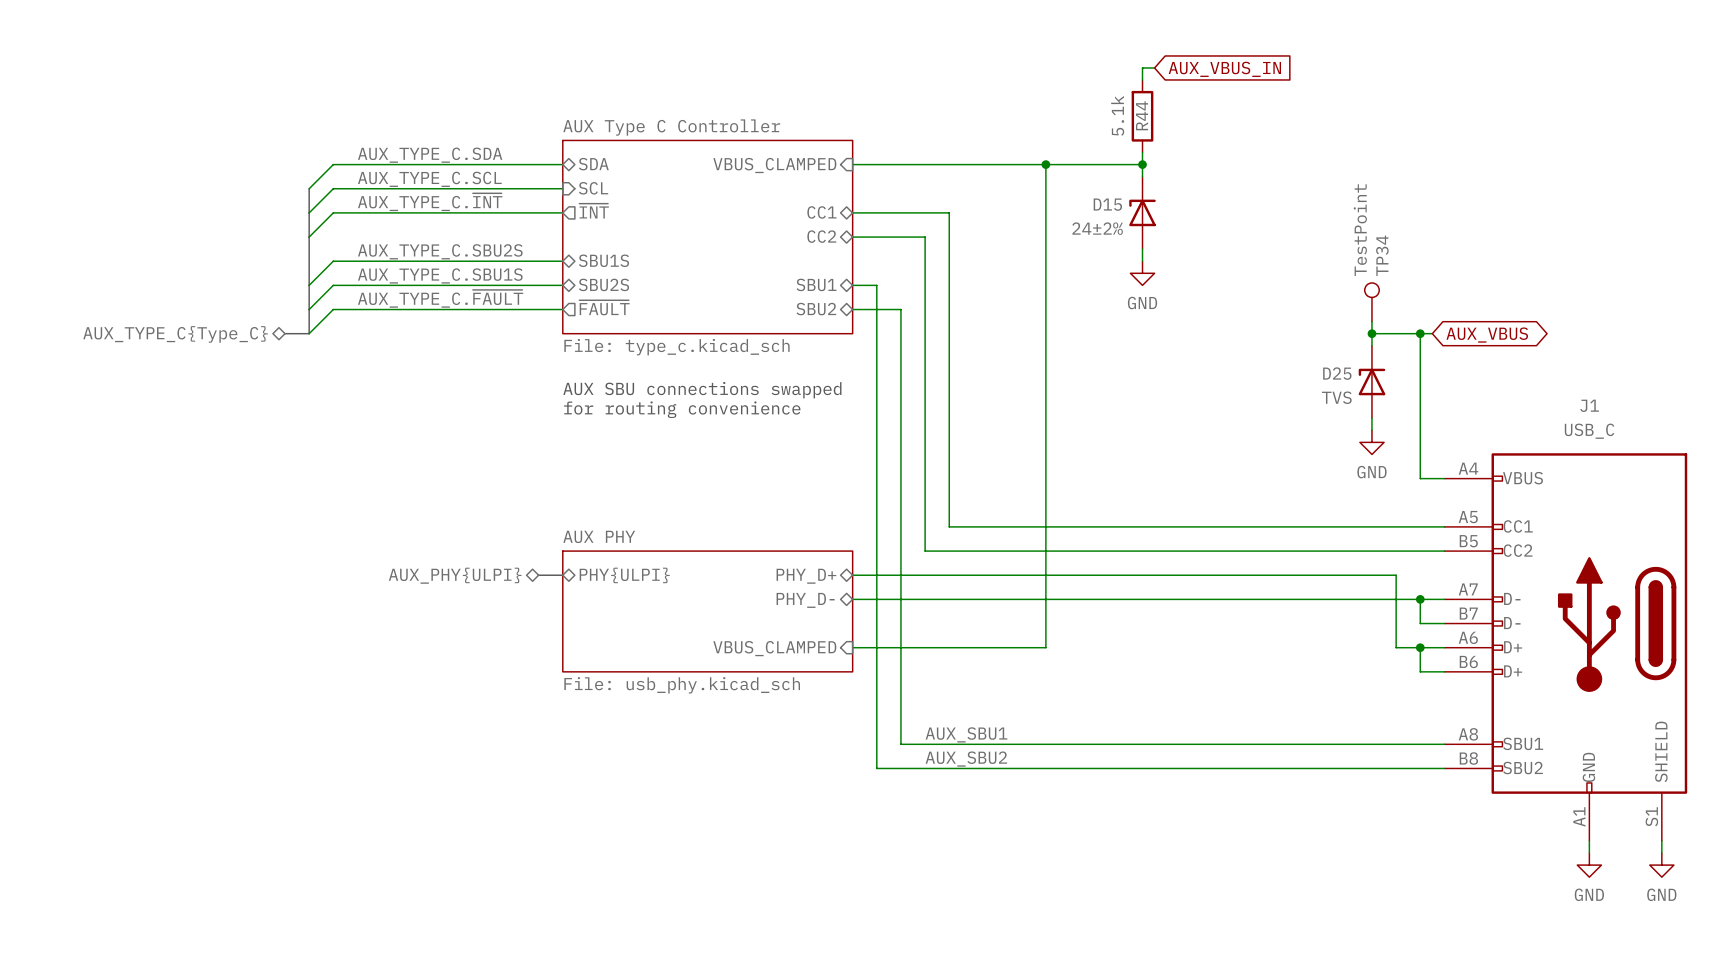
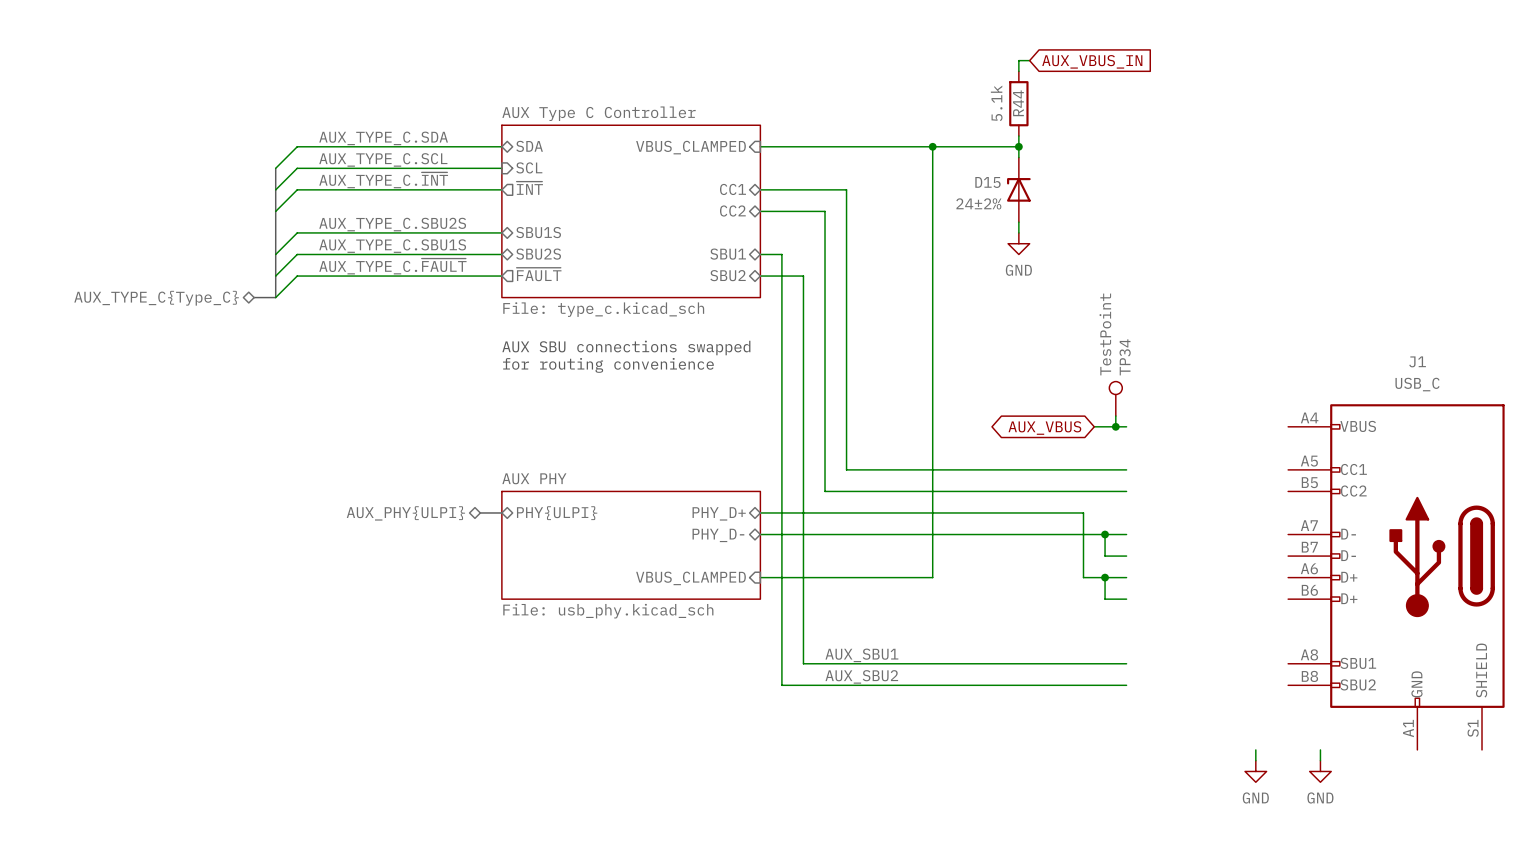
TP34 position: (1371, 302) -> (1115, 398)
wire: (1371, 321) (1371, 345) -> none
wire: (1371, 333) (1432, 333) -> none
junction: (1371, 333) -> none
wire: (1420, 333) (1420, 478) (1444, 478) -> none
junction: (1420, 333) -> none
global label: AUX_VBUS (1487, 335) -> none
D25: TVS (1371, 381) -> none
wire: (1371, 418) (1371, 430) -> (1115, 416) (1115, 426)
power symbol: GND (1371, 442) -> none
wire: none -> (1094, 426) (1126, 426)
junction: none -> (1115, 426)
global label: none -> AUX_VBUS (1044, 428)
wire: (1263, 526) (1444, 526) -> none
wire: (1263, 551) (1444, 551) -> none
wire: (1214, 575) (1396, 575) (1396, 647) (1444, 647) -> (1083, 512) (1083, 577) (1126, 577)
junction: none -> (1105, 534)
wire: (1263, 599) (1444, 599) -> none
wire: (1420, 599) (1420, 623) (1444, 623) -> (1105, 534) (1105, 556) (1126, 556)
junction: (1420, 599) -> none
junction: none -> (1105, 577)
wire: (1420, 647) (1420, 671) (1444, 671) -> (1105, 577) (1105, 599) (1126, 599)
junction: (1420, 647) -> none
wire: (1263, 744) (1444, 744) -> none
wire: (1263, 768) (1444, 768) -> none
wire: (1589, 840) (1589, 853) -> (1255, 749) (1255, 760)
wire: (1661, 840) (1661, 853) -> (1320, 749) (1320, 760)
power symbol: none -> GND (1255, 771)
power symbol: none -> GND (1320, 771)
power symbol: GND (1589, 865) -> none
power symbol: GND (1661, 865) -> none

